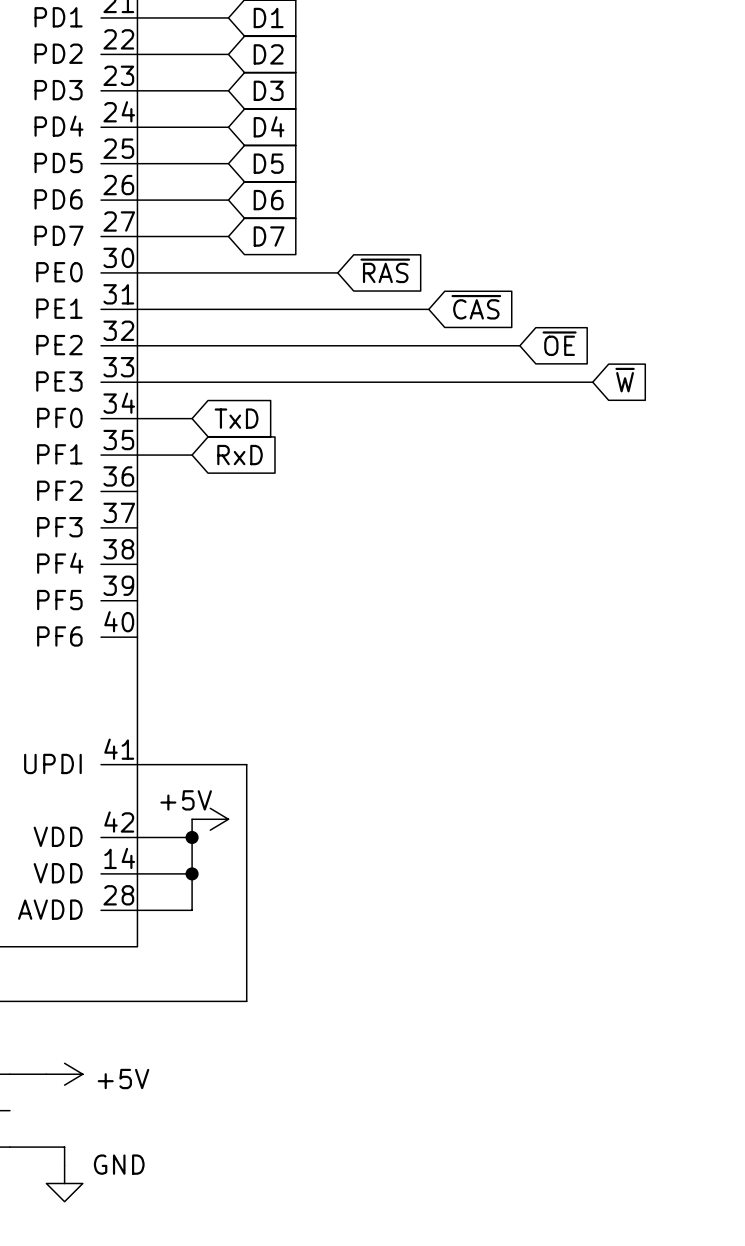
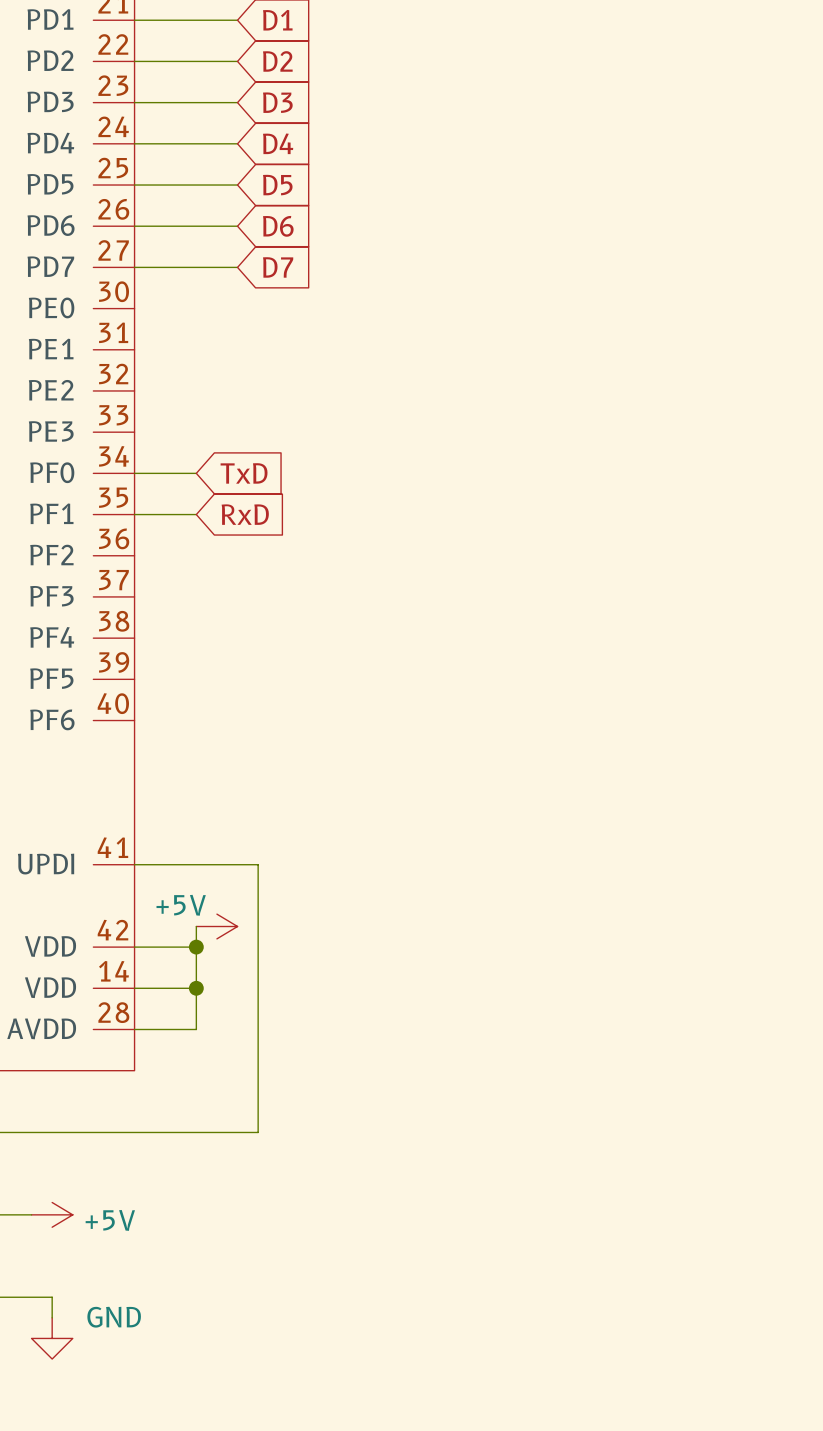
global label: ~{RAS} (385, 270) -> none
wire: (137, 272) (337, 272) -> none
global label: ~{CAS} (476, 307) -> none
wire: (137, 309) (428, 309) -> none
global label: ~{OE} (559, 343) -> none
wire: (137, 345) (519, 345) -> none
global label: ~{W} (625, 380) -> none
wire: (137, 382) (592, 382) -> none

